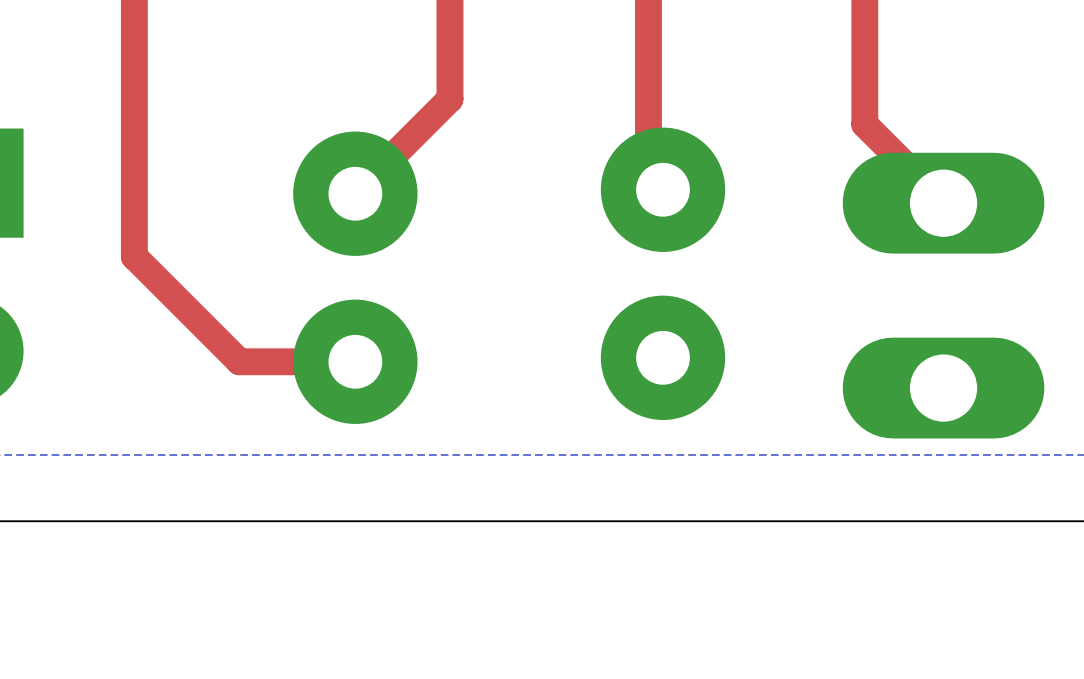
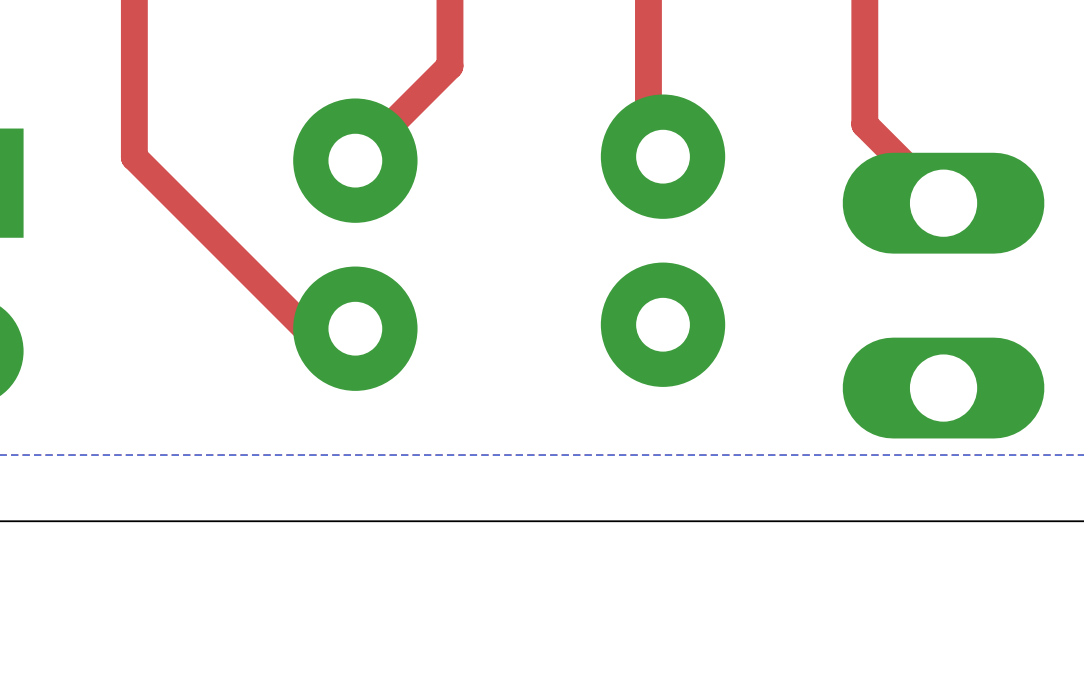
top track: (449, 66) (449, 99) (355, 193) -> (449, 66) (355, 160)
top track: (134, 157) (134, 256) (239, 361) (355, 361) -> (134, 157) (305, 328) (355, 328)
part position: (663, 273) -> (663, 240)
part position: (355, 277) -> (355, 244)

